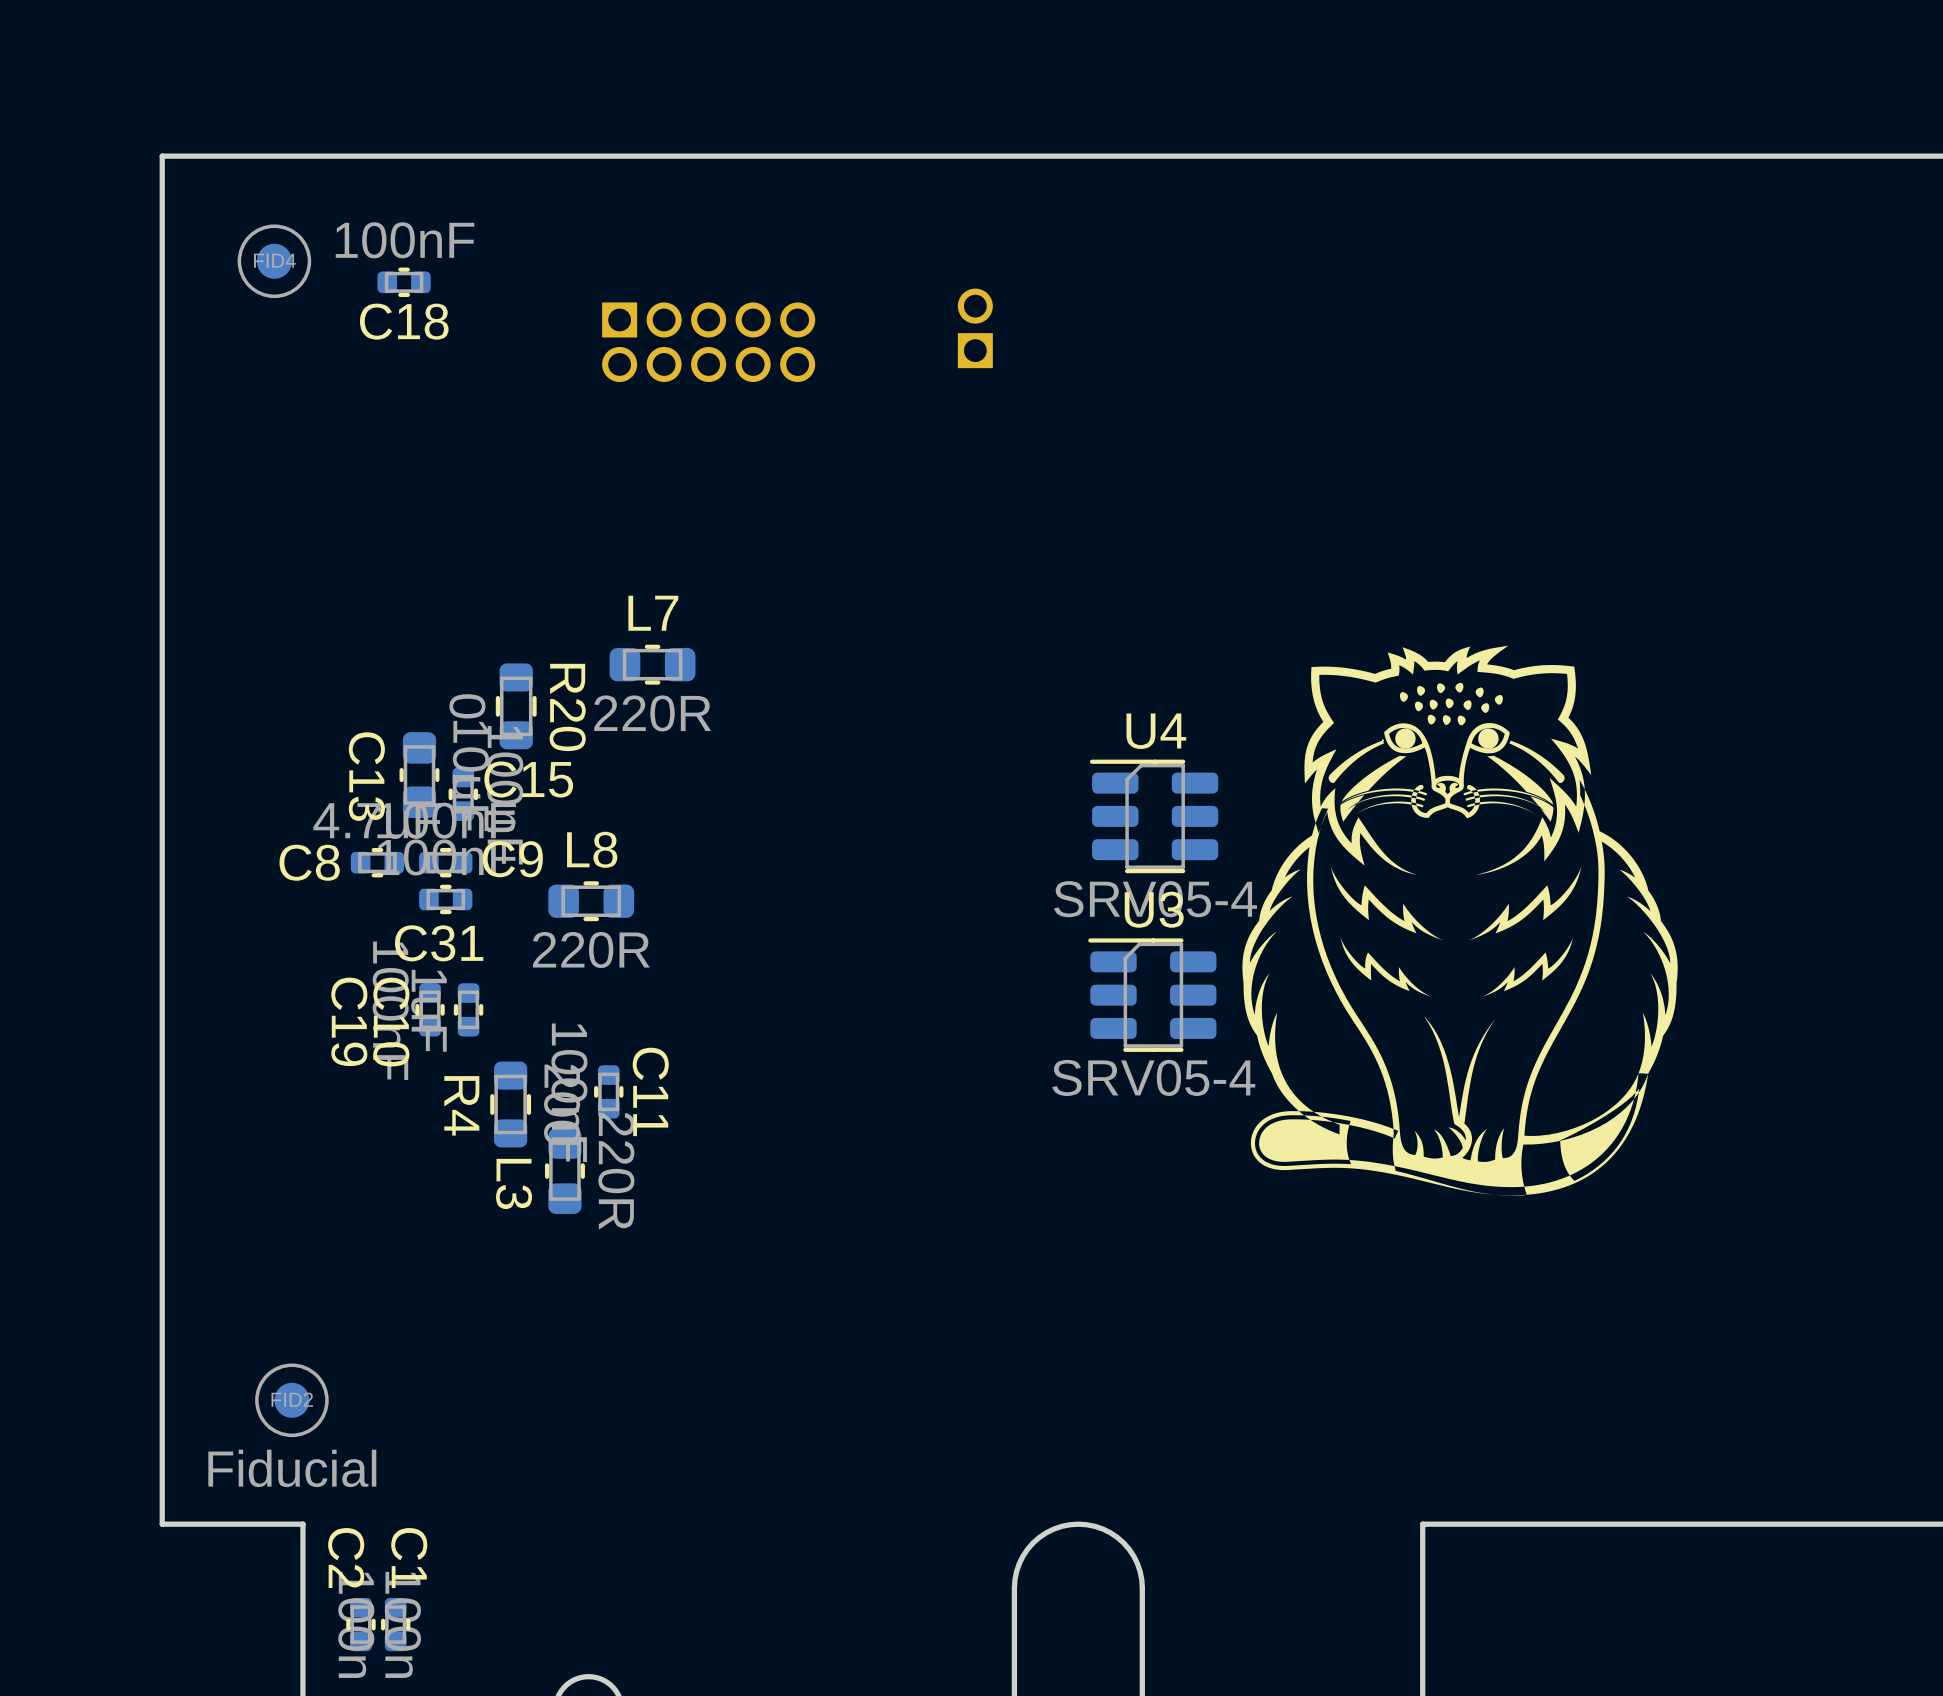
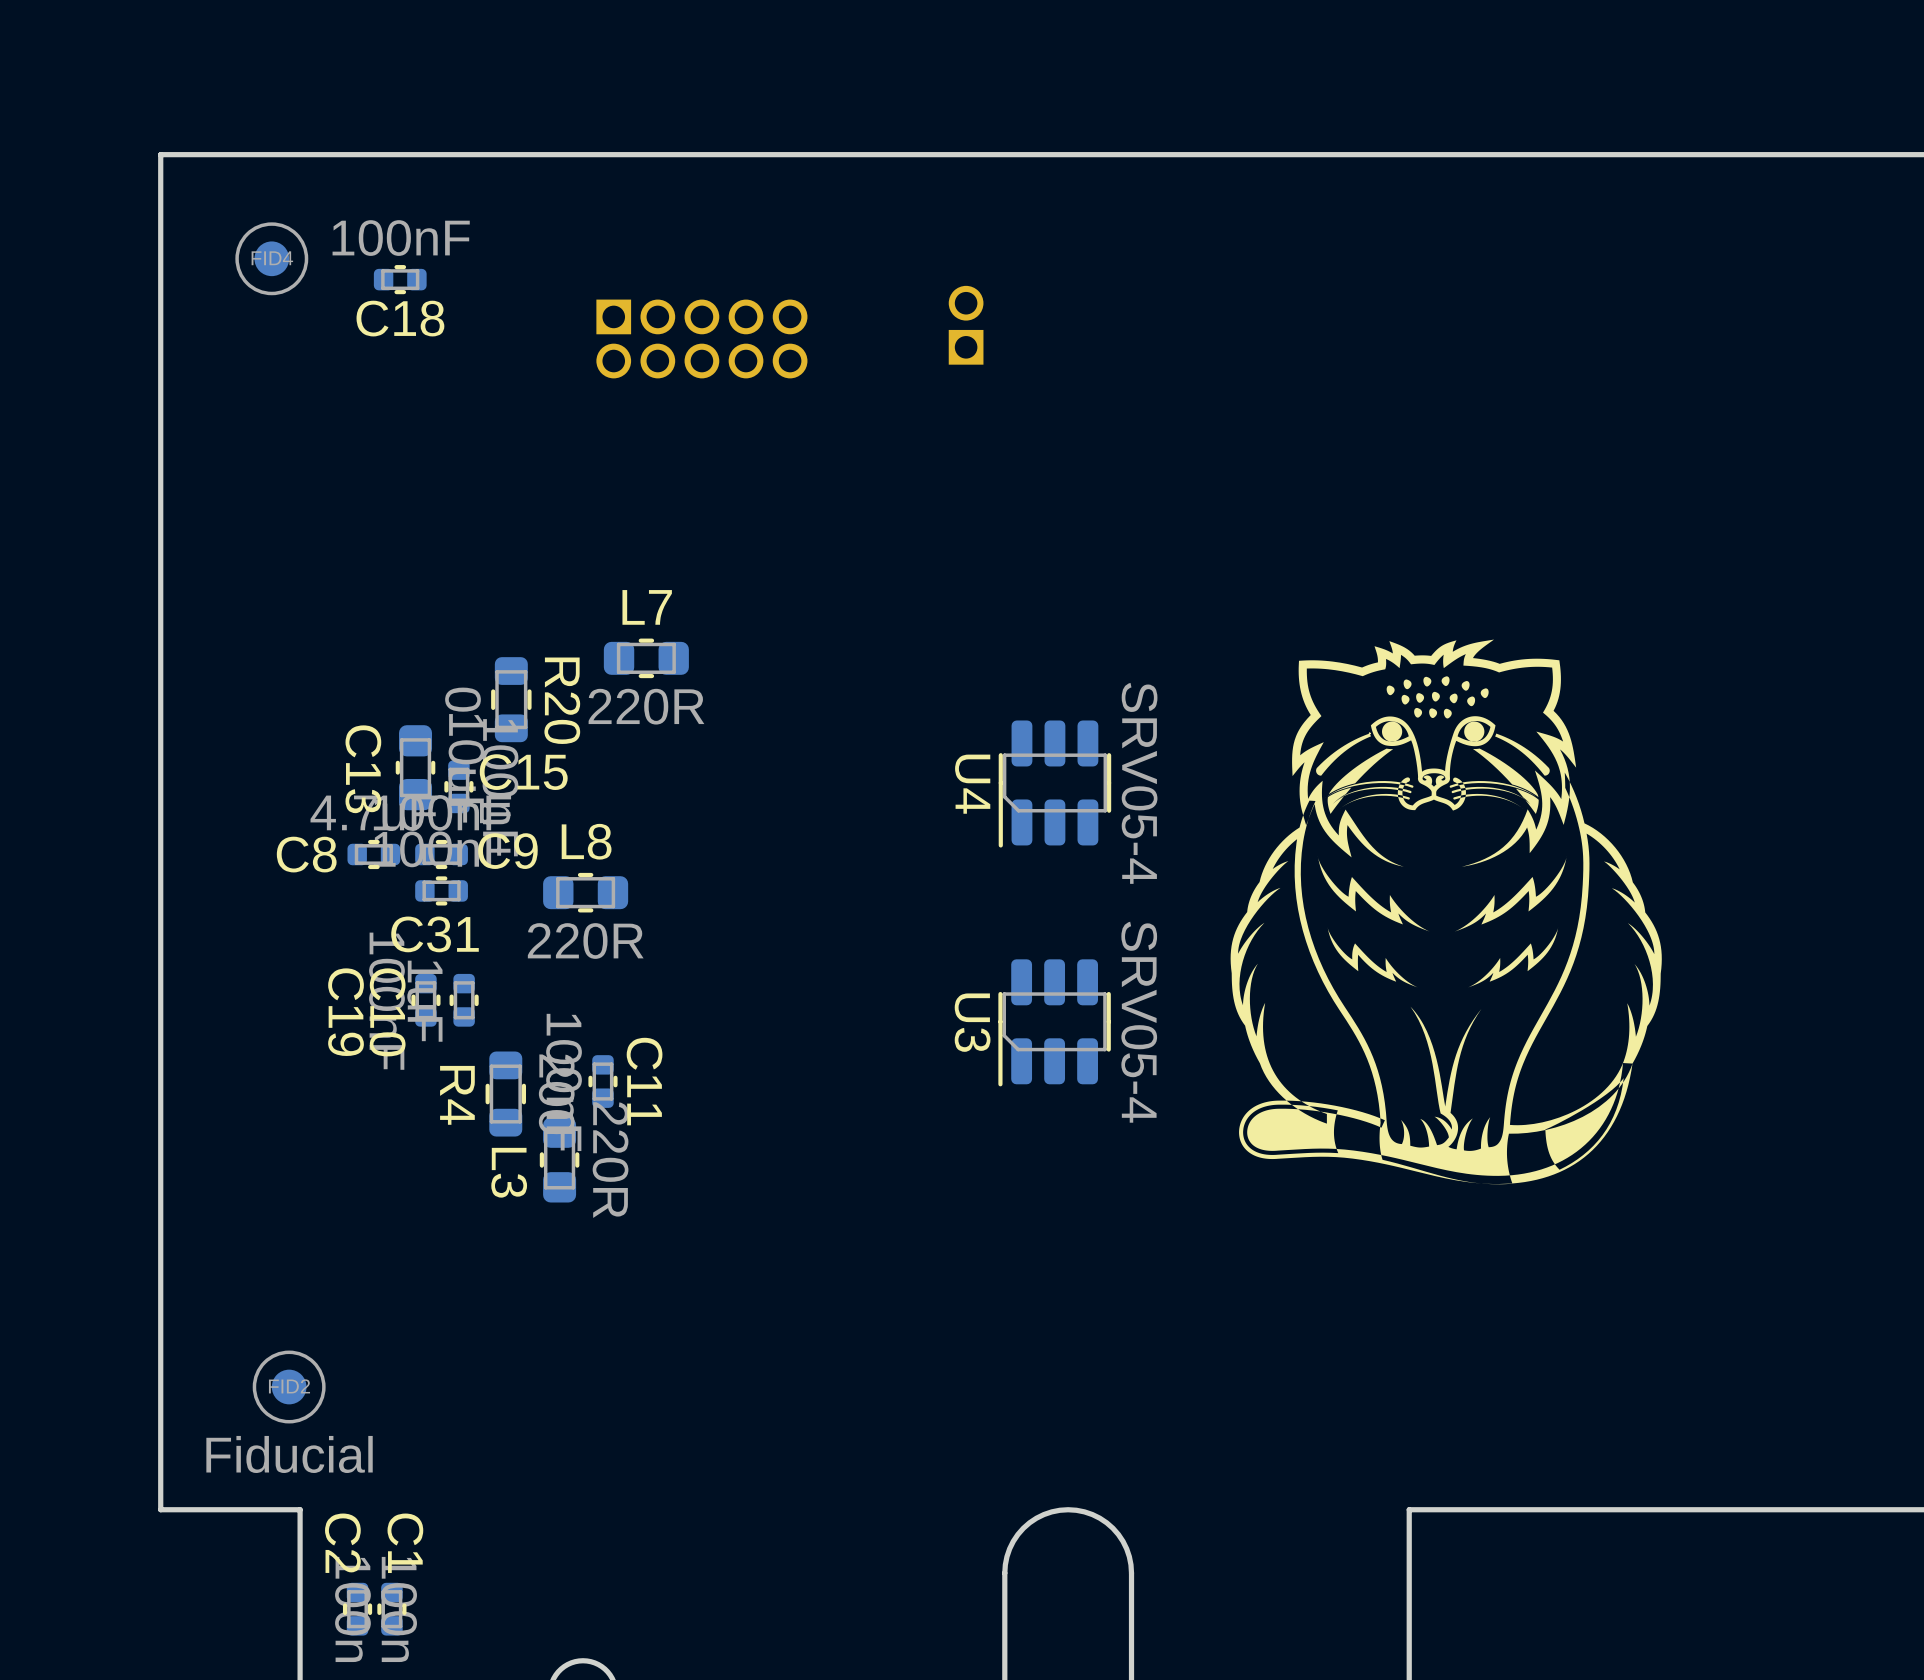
U4 rotation: 0° (1154, 816) -> 90° counterclockwise (1054, 784)
U4 position: (1154, 816) -> (1054, 784)
U3 rotation: 0° (1152, 995) -> 90° counterclockwise (1054, 1022)
U3 position: (1152, 995) -> (1054, 1022)

